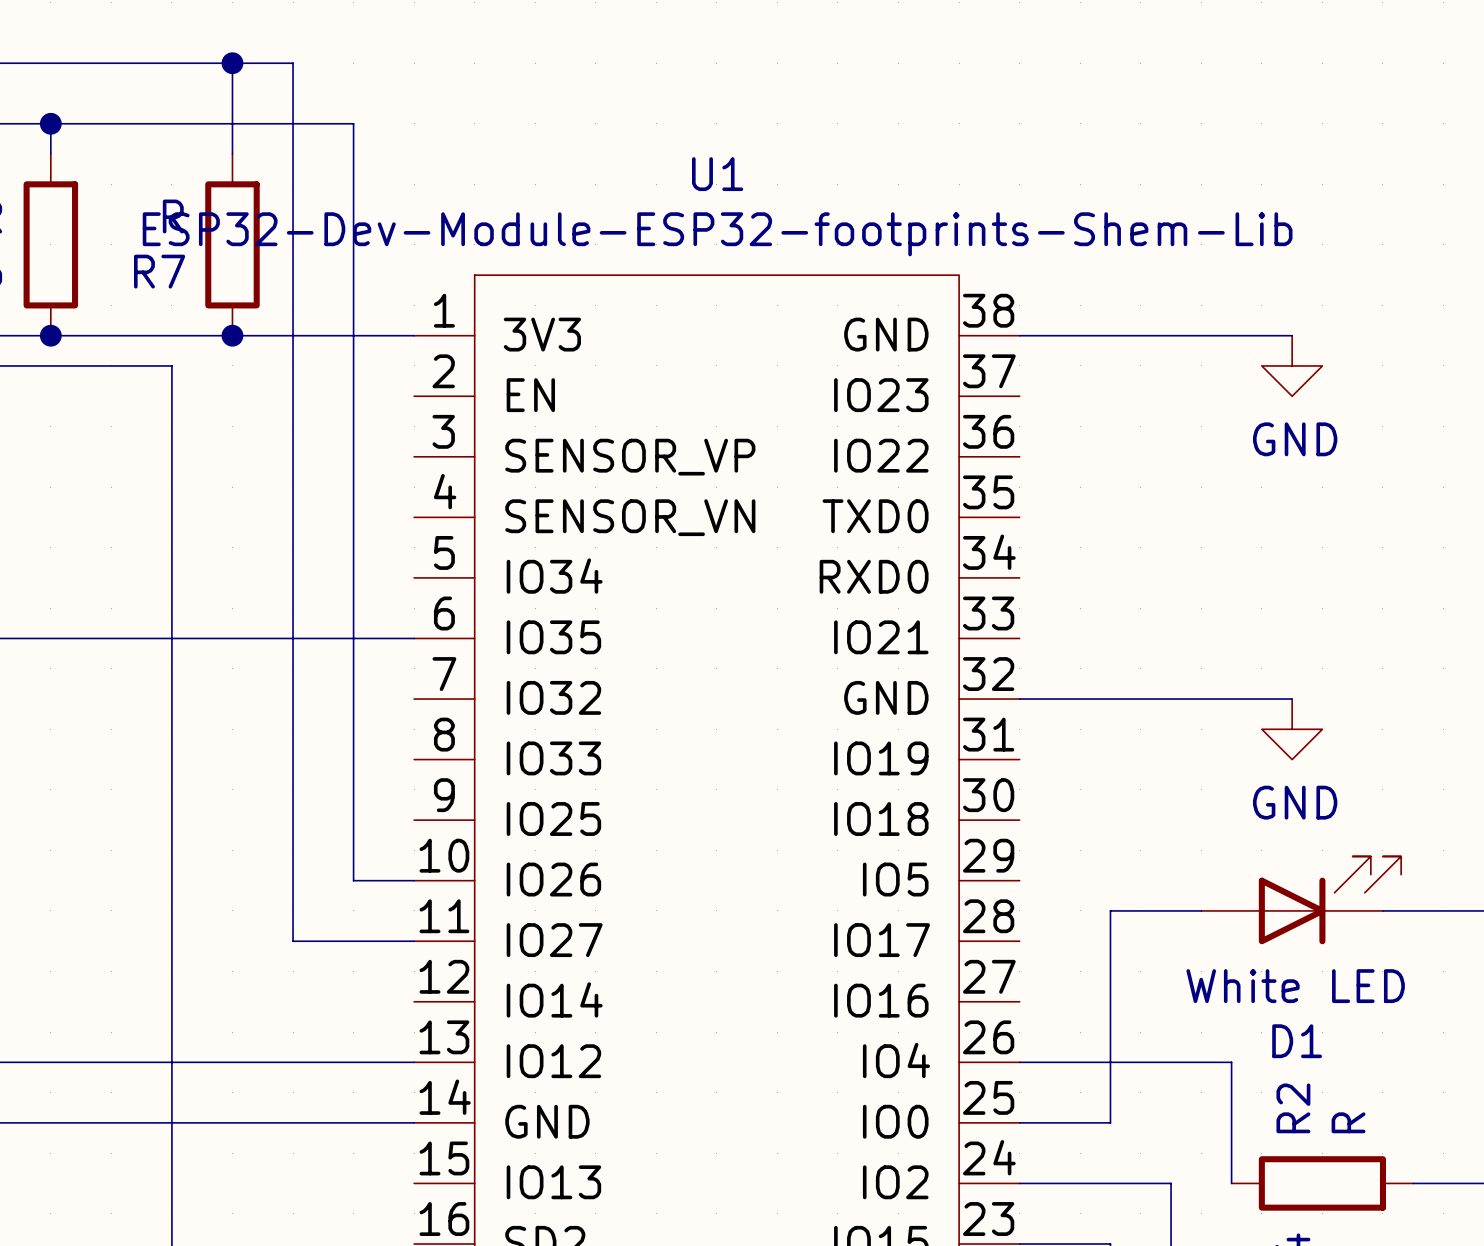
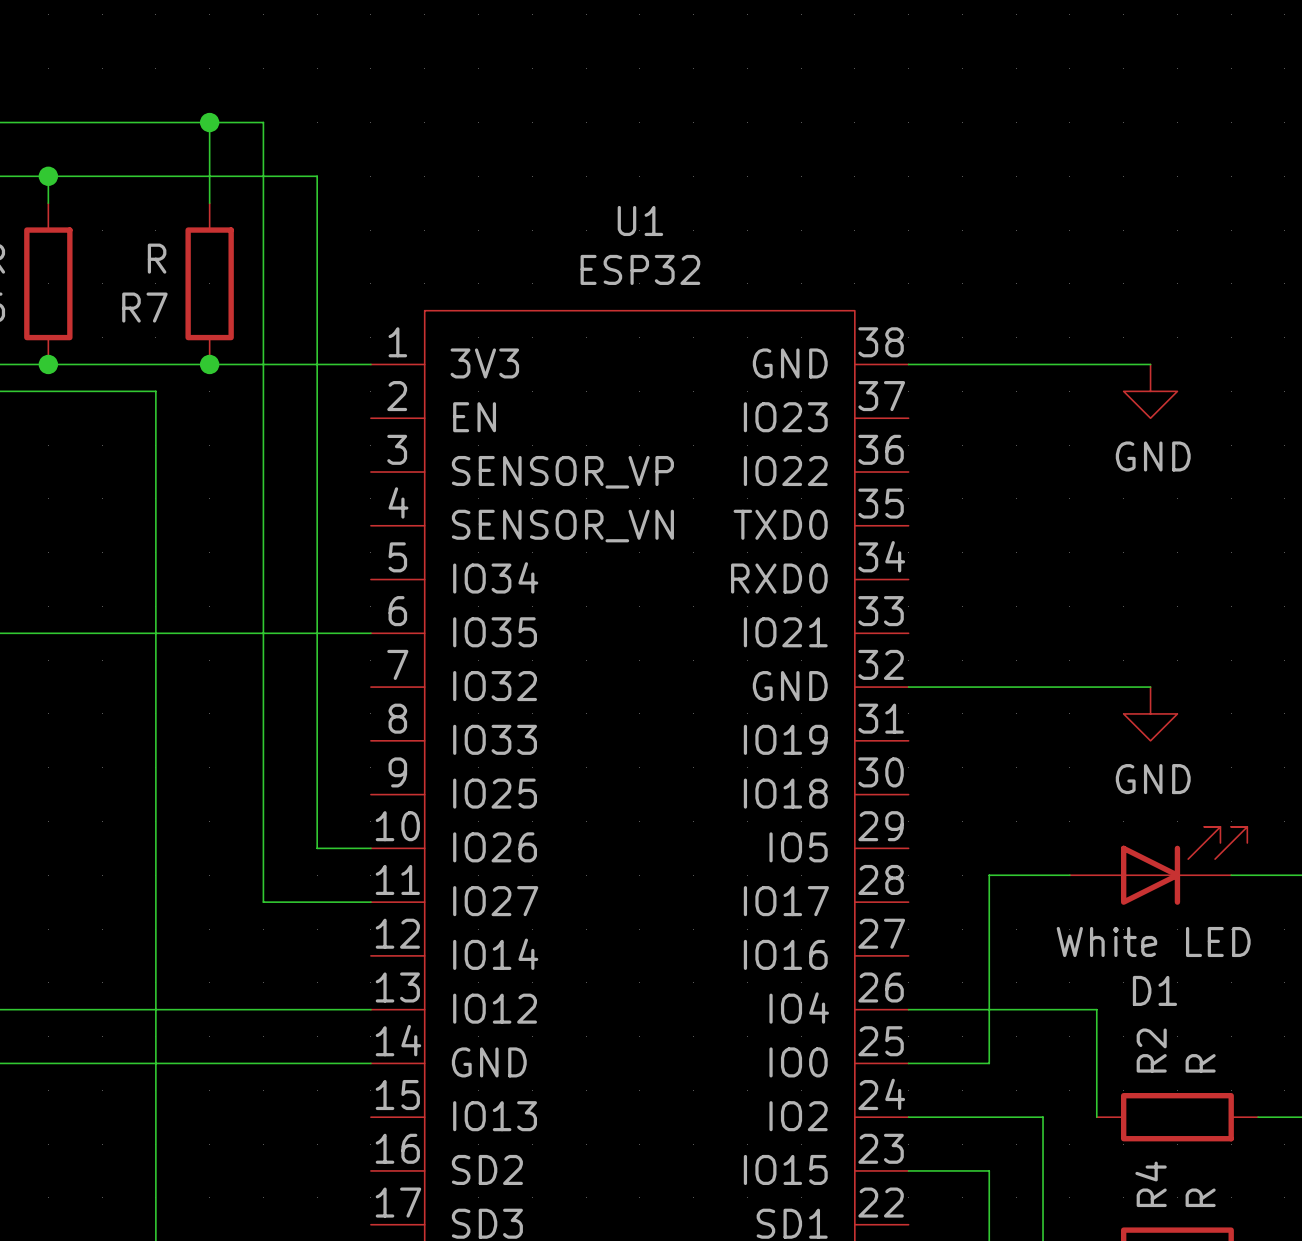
U1 value: ESP32-Dev-Module-ESP32-footprints-Shem-Lib (717, 234) -> ESP32 (640, 269)

